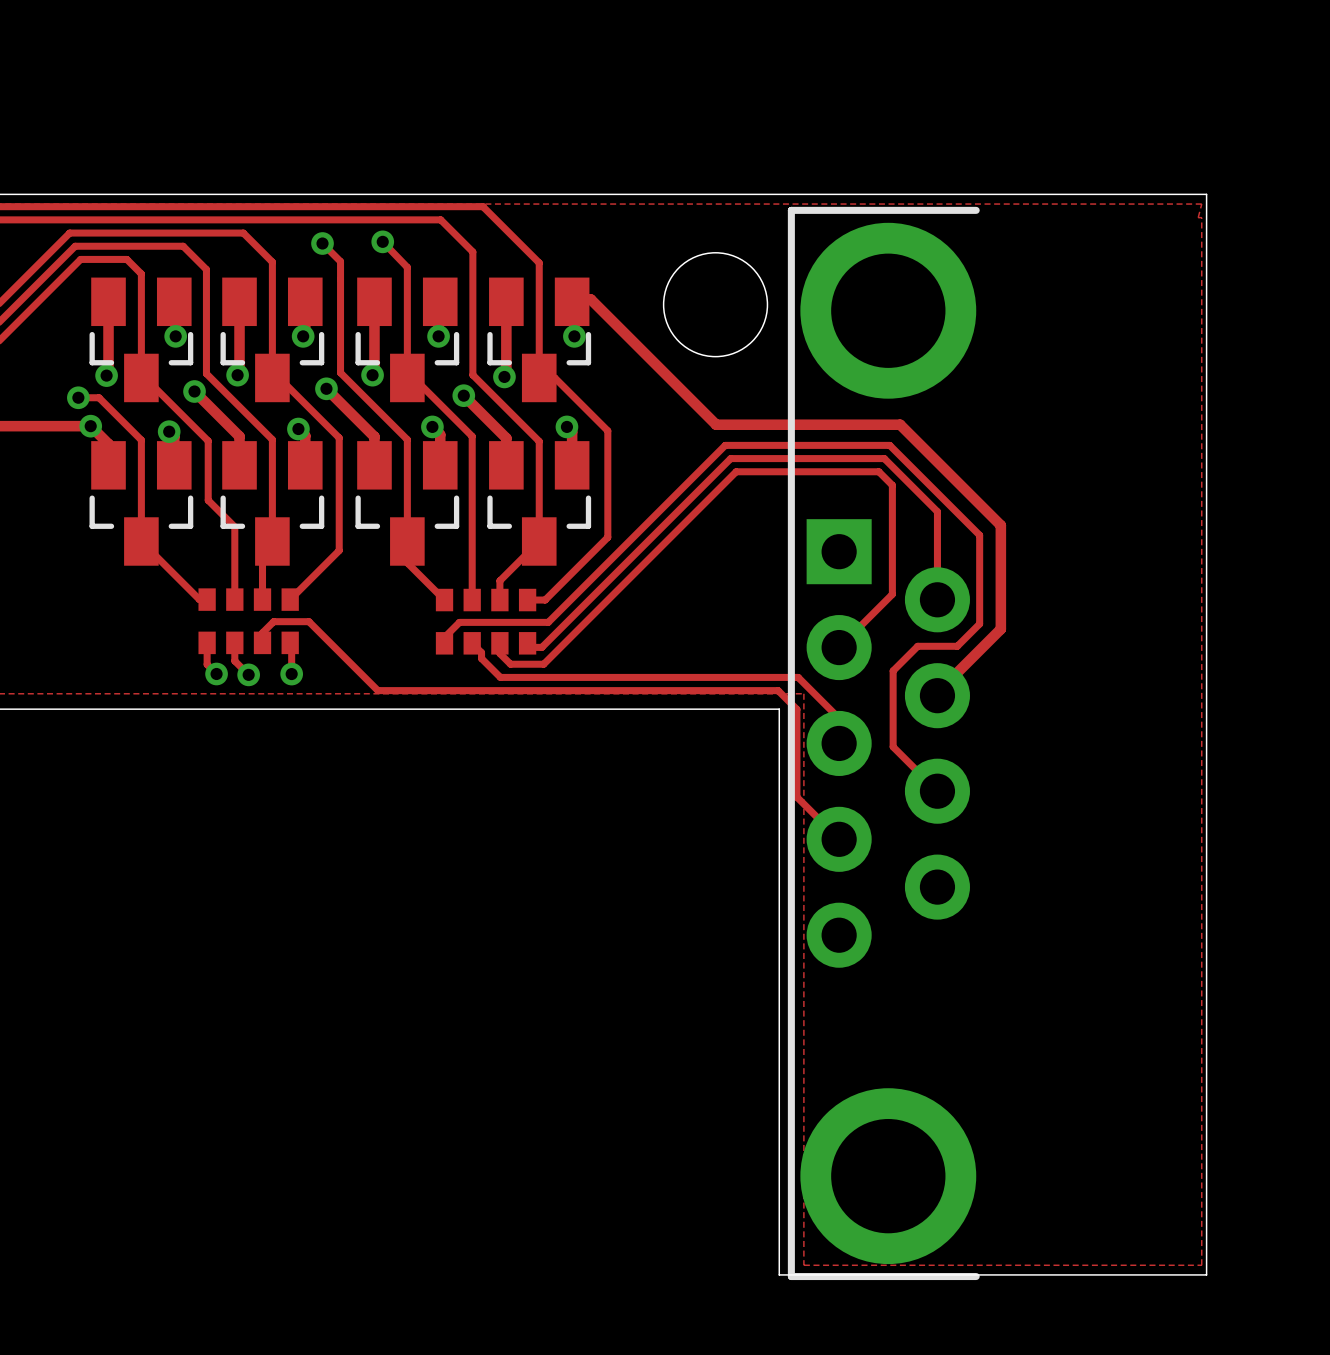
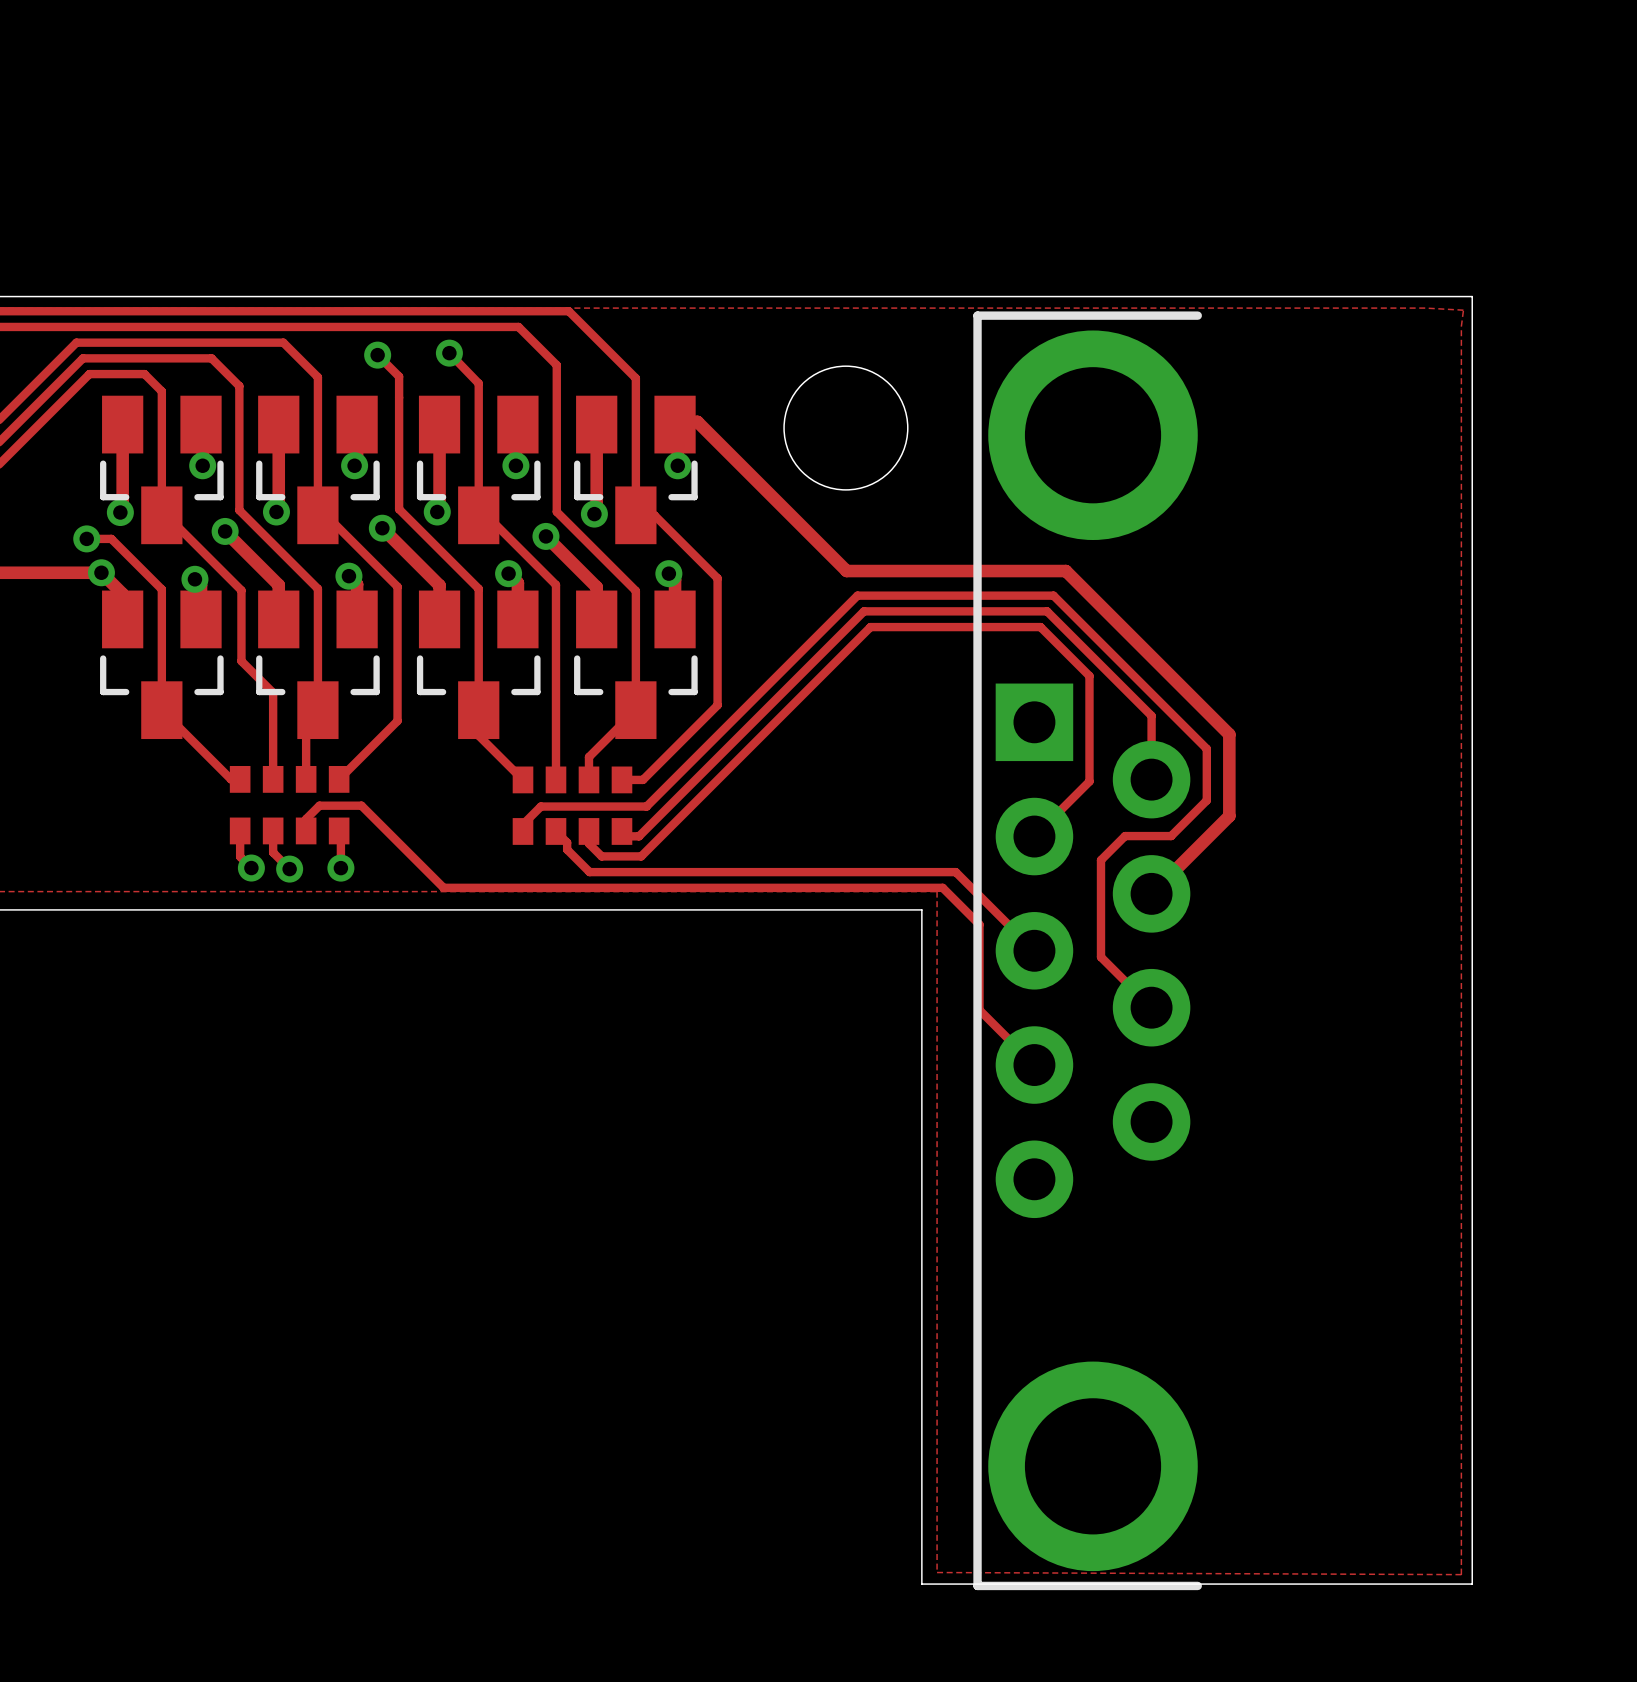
board edge: (1206, 194) (1206, 1274) -> (1430, 296) (1472, 296) (1472, 1584) (1430, 1584)
zone outline: (1201, 204) (1198, 217) (1201, 217) (1201, 1265) (803, 1265) (803, 693) (792, 693) -> (1425, 308) (1463, 310) (1461, 326) (1461, 1574) (937, 1572) (937, 891)
track: (892, 485) (892, 594) (839, 647) -> (1056, 643) (1089, 676) (1089, 781) (1034, 836)
track: (937, 511) (937, 599) -> (1110, 674) (1151, 715) (1151, 779)
track: (1000, 525) (1000, 629) (937, 692) (937, 695) -> (1185, 690) (1229, 734) (1229, 816) (1151, 893)
track: (979, 535) (979, 623) (957, 646) (917, 646) (893, 670) (893, 746) (937, 791) -> (1160, 702) (1206, 748) (1206, 800) (1171, 836) (1125, 836) (1101, 860) (1101, 957) (1151, 1007)
track: (798, 677) (839, 718) (839, 743) -> (944, 872) (955, 872) (1034, 950)
track: (778, 690) (796, 709) (796, 797) (839, 839) -> (920, 887) (942, 887) (979, 924) (979, 1010) (1034, 1065)
part position: (883, 743) -> (1087, 950)

